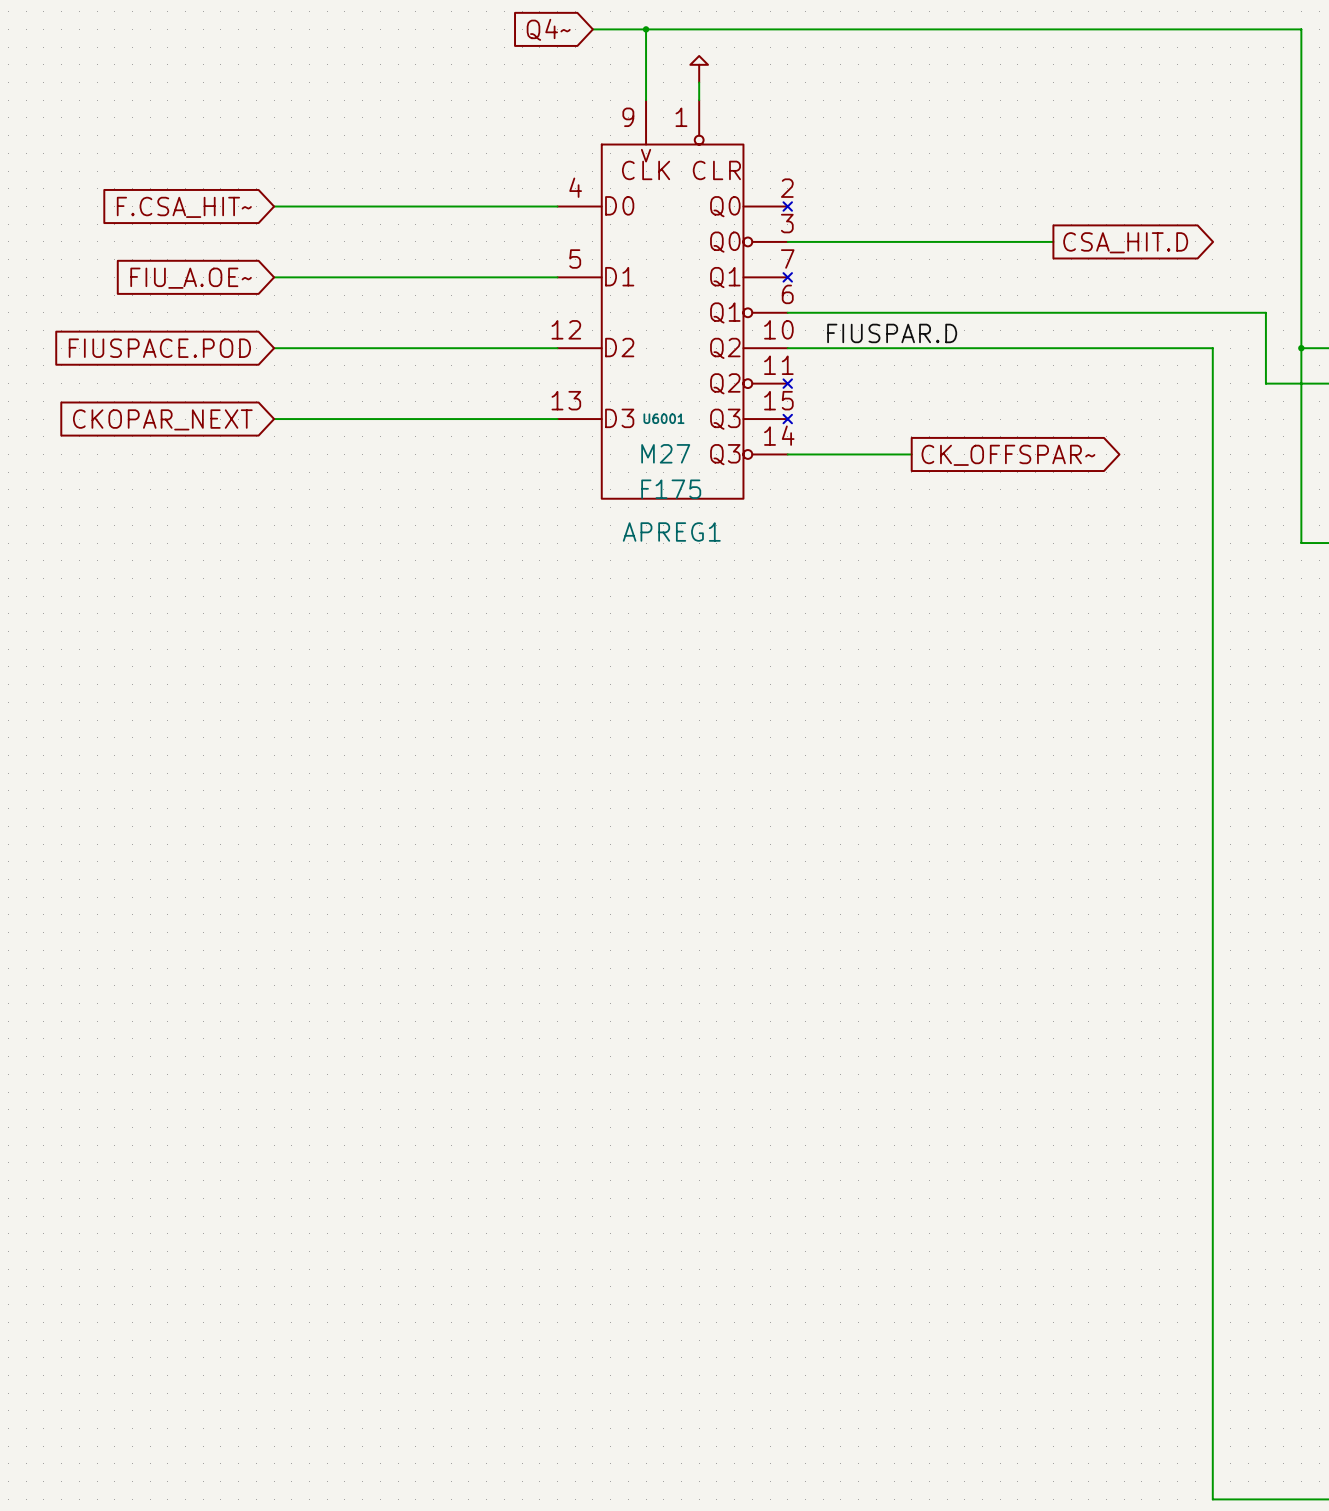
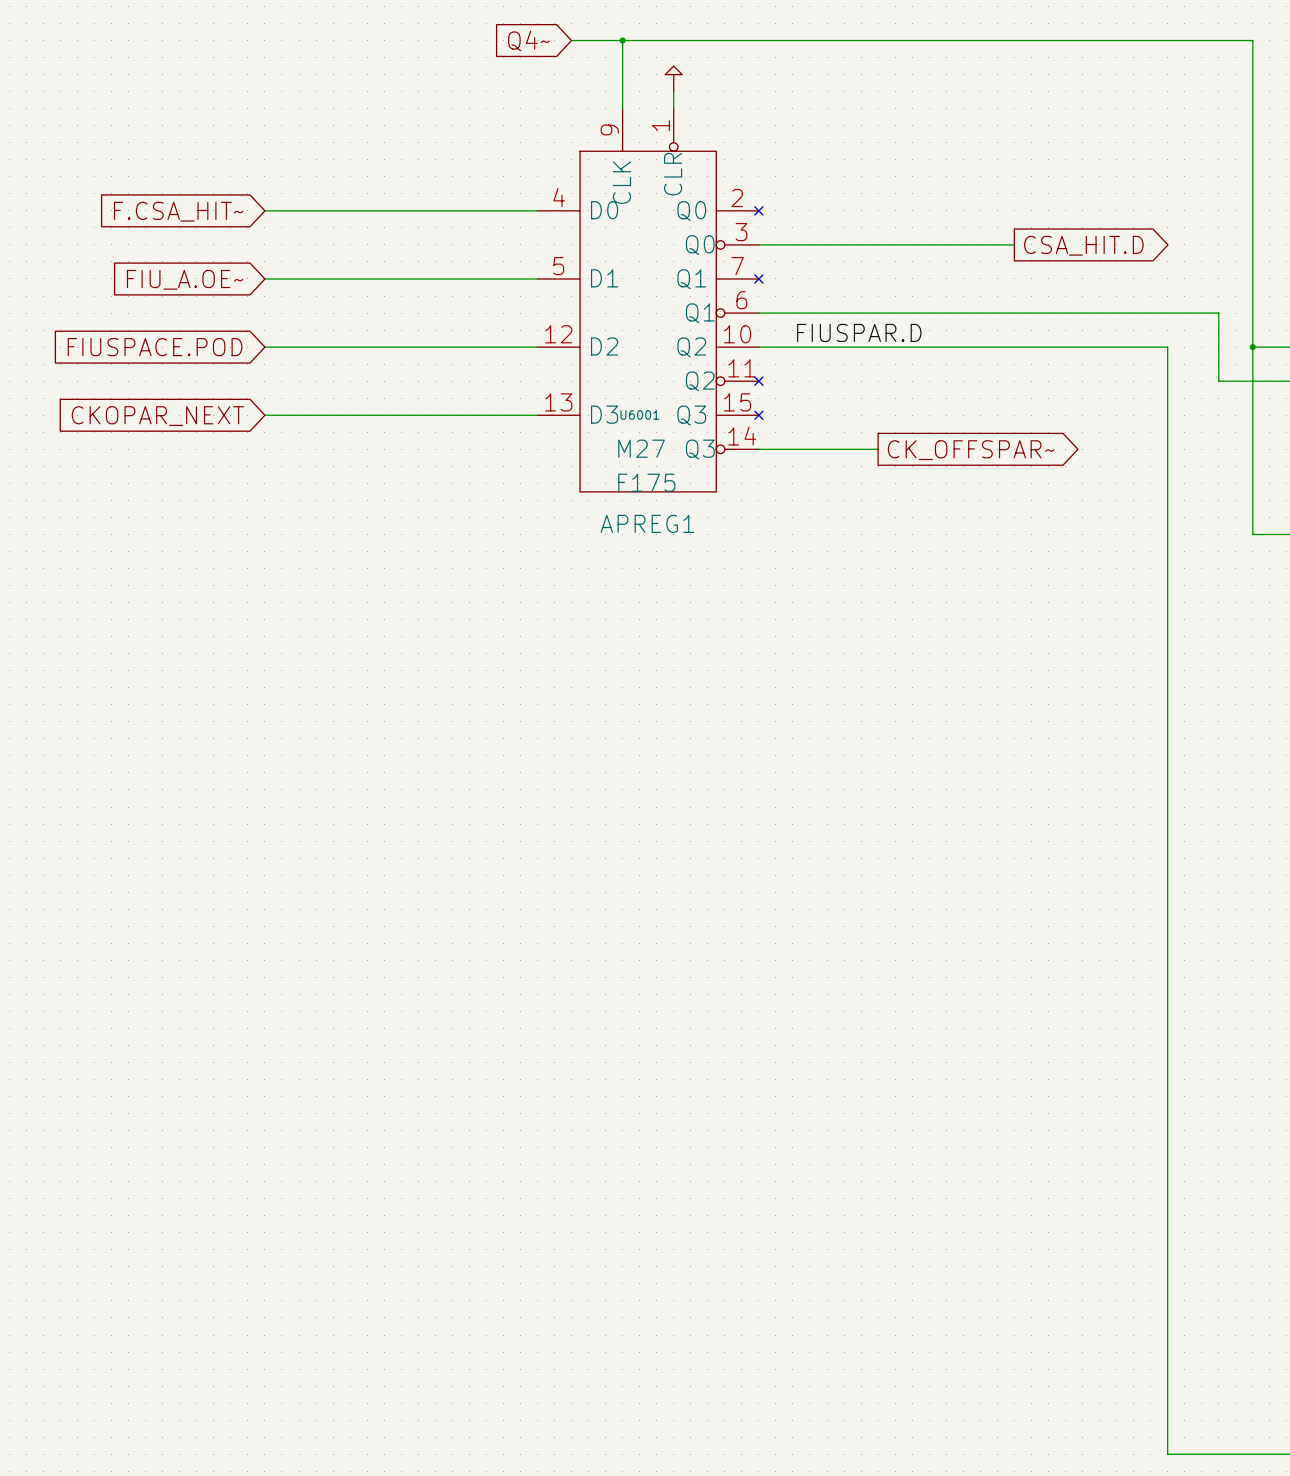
U6001 symbol: [557, 100, 788, 499] -> [537, 108, 759, 492]

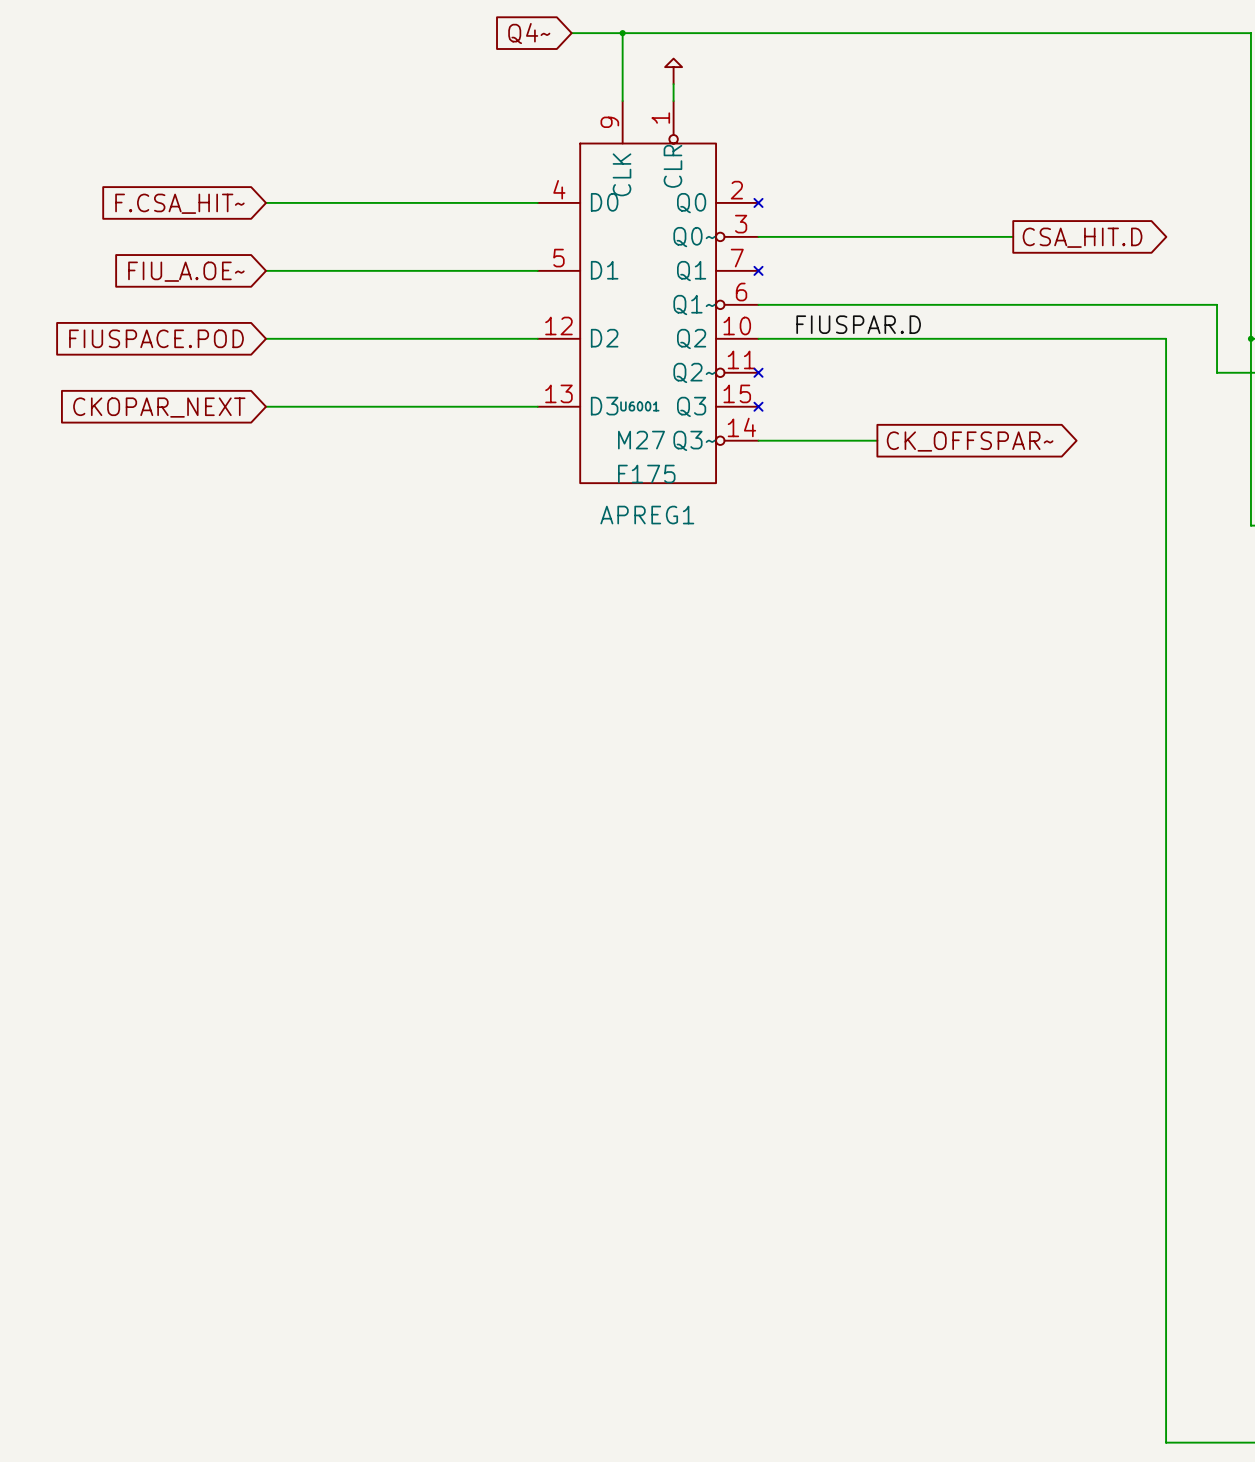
U6001 pin name: Q0 (700, 245) -> Q0~ (694, 237)
U6001 pin name: Q1 (700, 313) -> Q1~ (694, 305)
U6001 pin name: Q2 (700, 381) -> Q2~ (694, 372)
U6001 pin name: Q3 (700, 449) -> Q3~ (694, 440)

